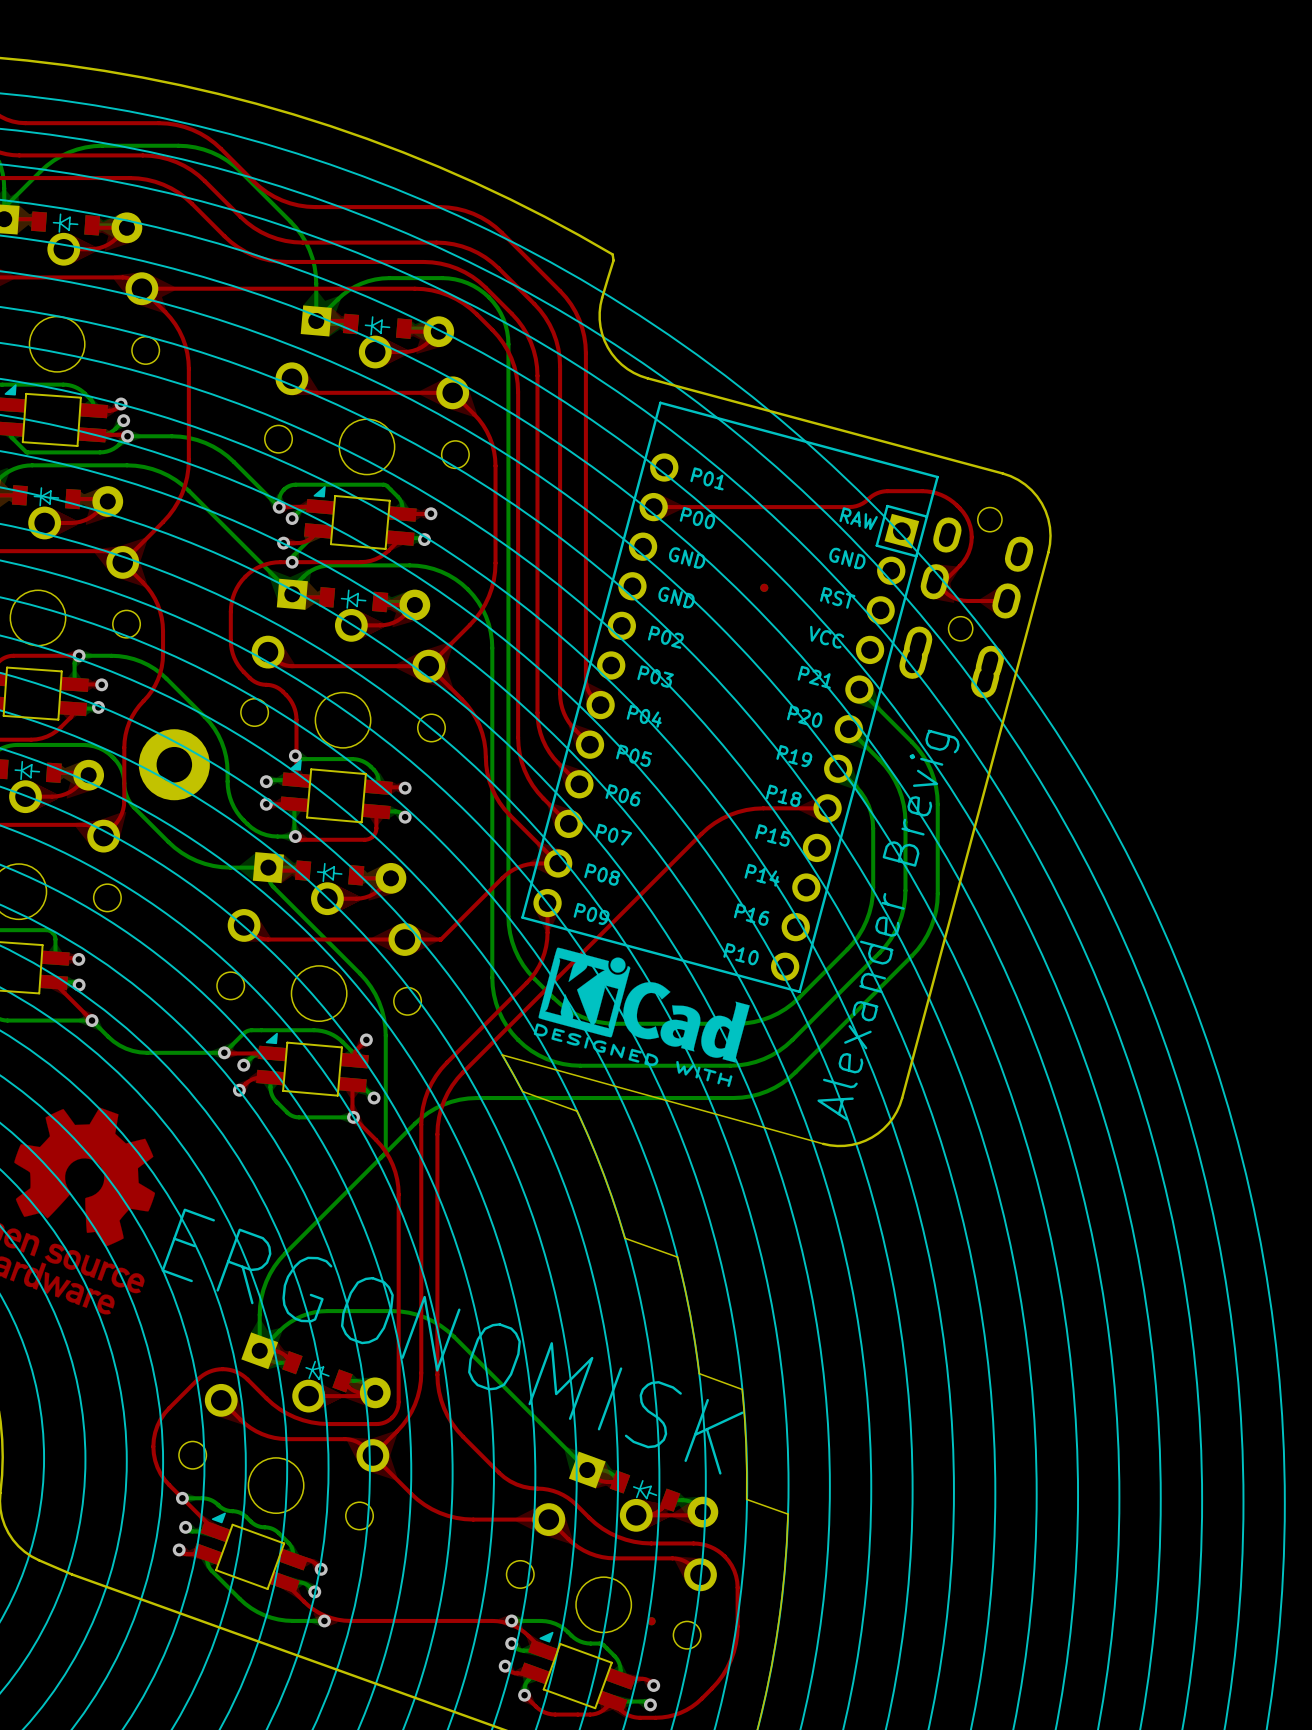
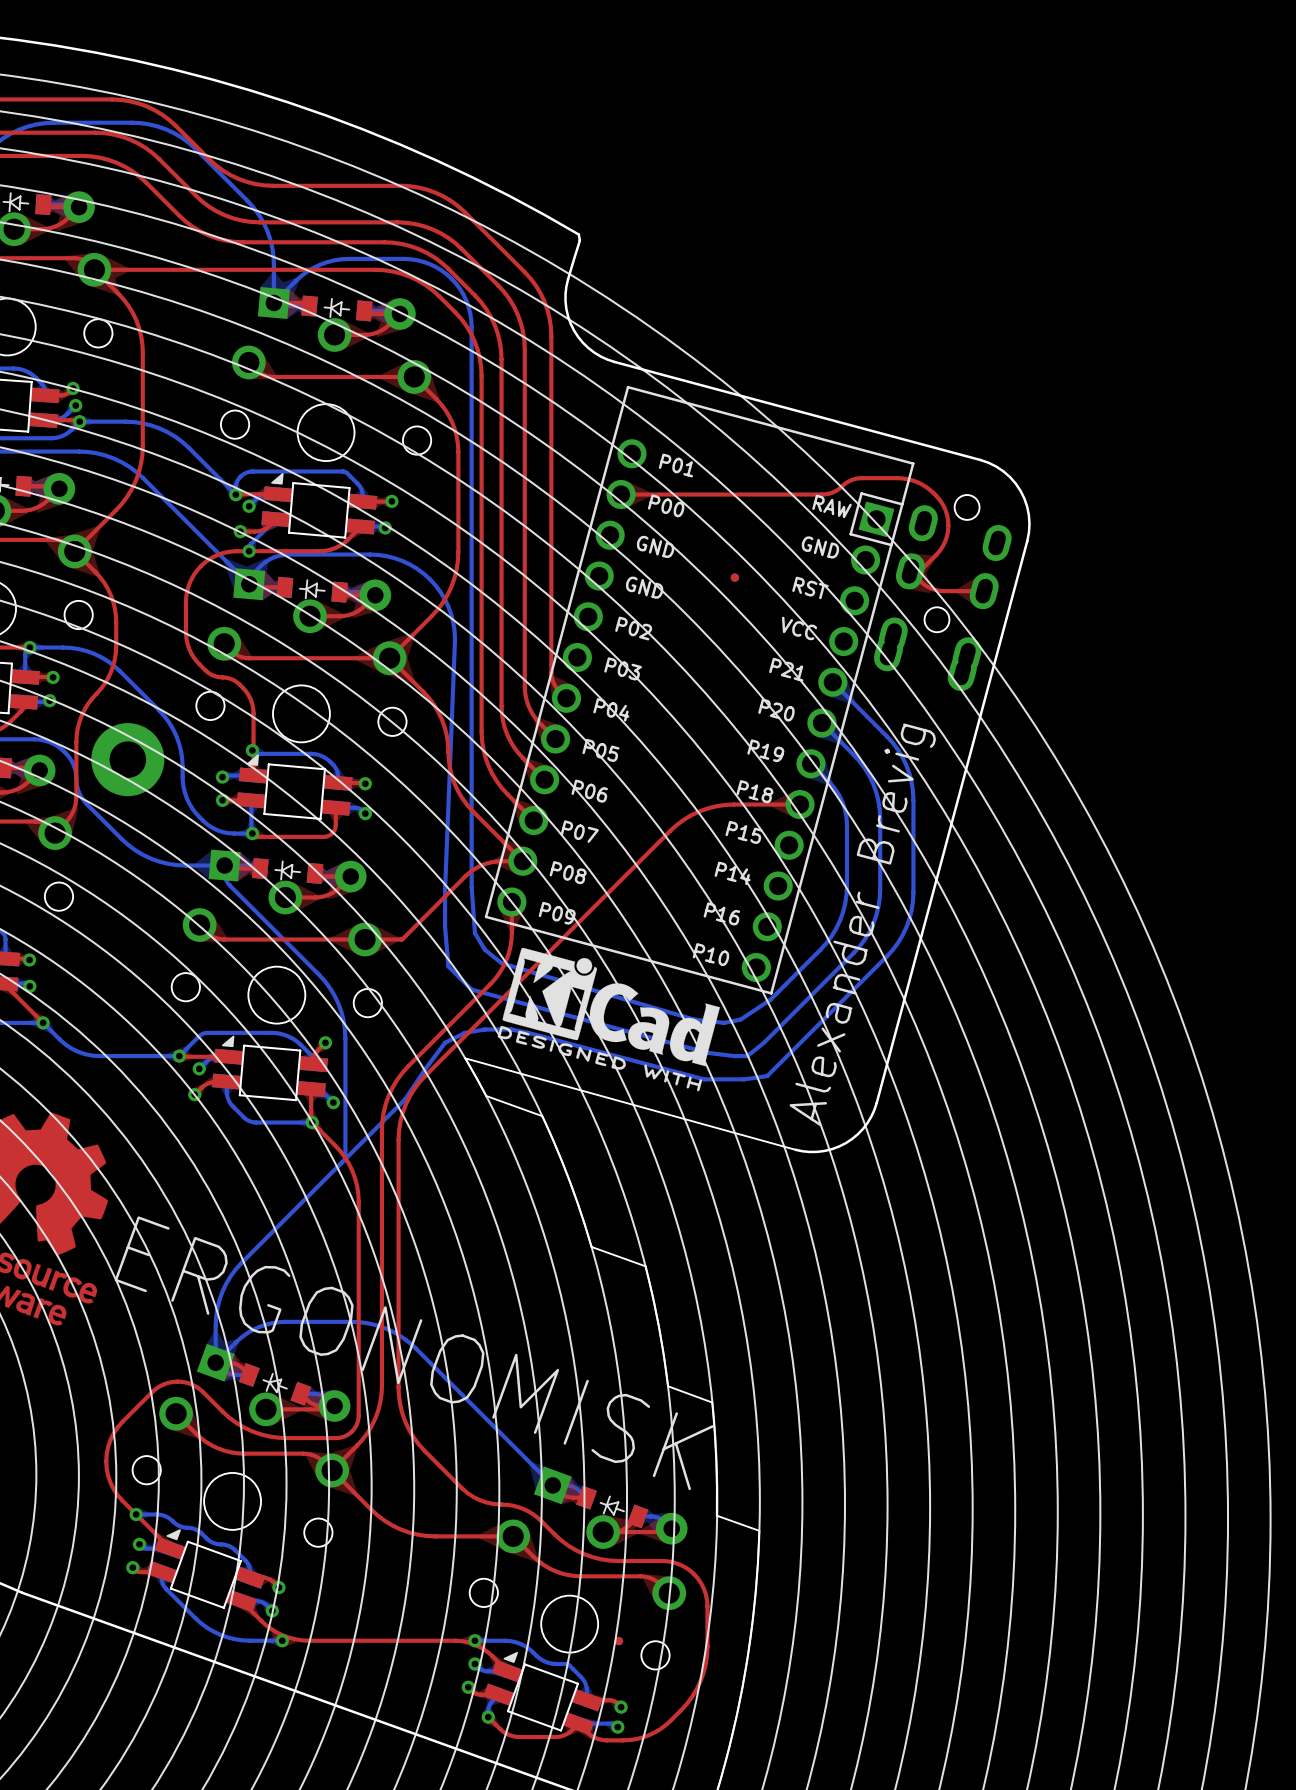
bottom track: (492, 648) (492, 986) (498, 1011) (507, 1026) (518, 1039) -> (455, 639) (445, 890) (445, 926) (448, 966) (471, 989) (707, 1052) (747, 1056) (763, 1042)
bottom track: (508, 888) (510, 933) (518, 957) (528, 972) (553, 998) (567, 1008) (582, 1017) (598, 1022) (615, 1023) (745, 1023) (762, 1019) (778, 1013) (798, 998) -> (471, 887) (474, 933) (484, 949) (501, 963) (694, 1019) (724, 1022) (740, 1019) (770, 999)
bottom track: (518, 1040) (531, 1050) (546, 1059) (563, 1064) (580, 1065) (738, 1065) (763, 1059) (779, 1050) (792, 1040) -> none
bottom track: (795, 1072) (782, 1083) (767, 1091) (742, 1097) (468, 1098) (443, 1104) (428, 1112) (414, 1123) -> (767, 1076) (744, 1079) (704, 1079) (528, 1032) (511, 1029) (484, 1029) (464, 1032) (445, 1042) (405, 1099) (375, 1129)

